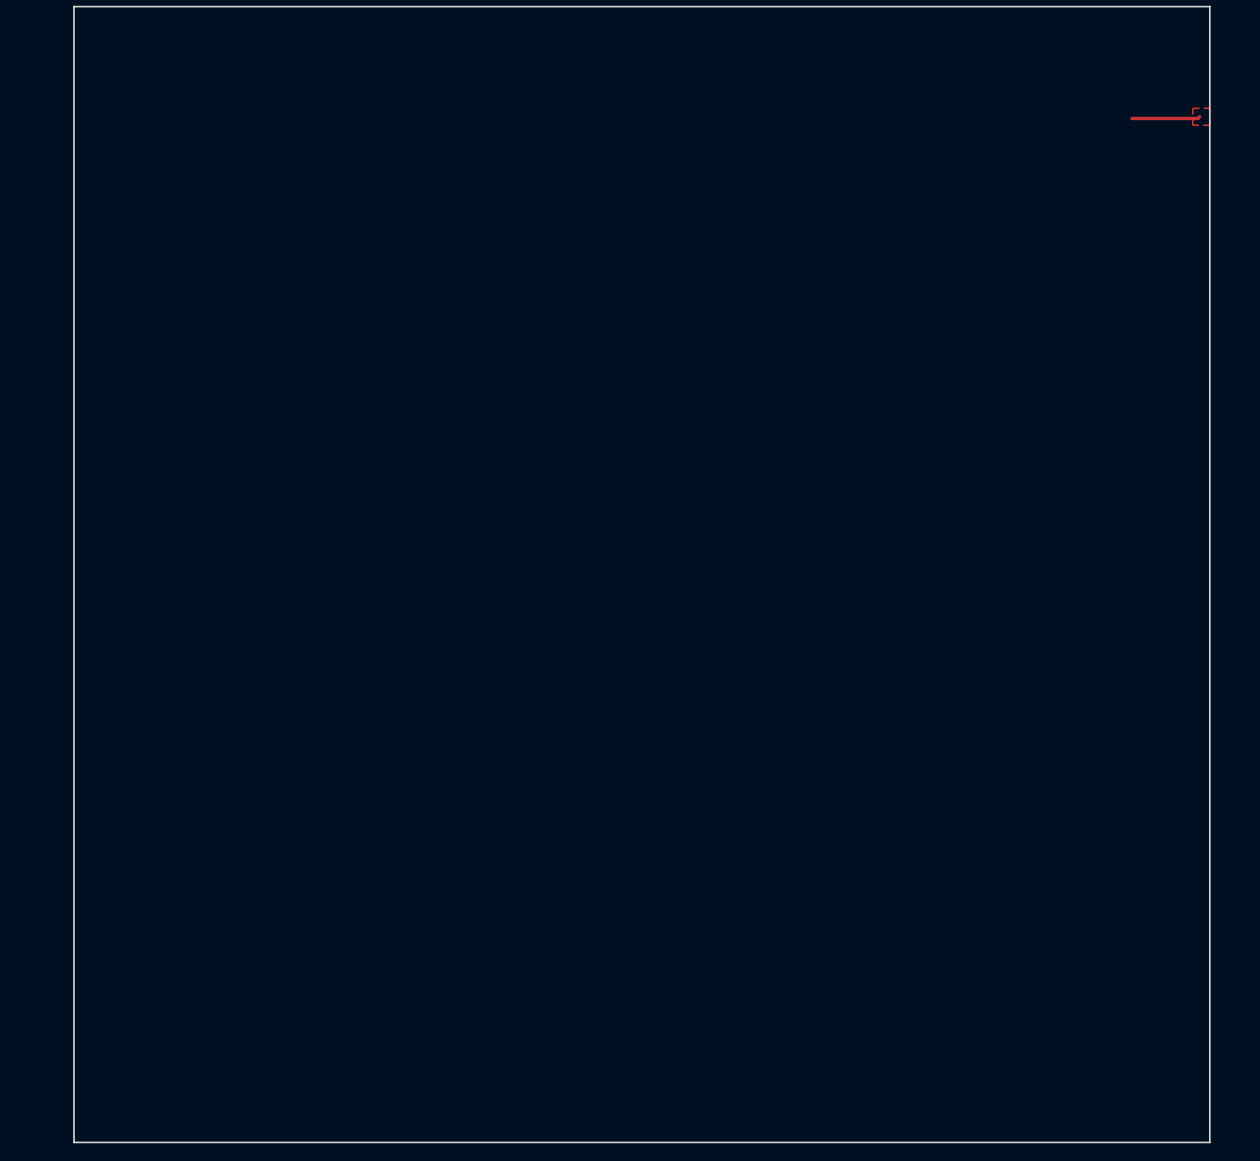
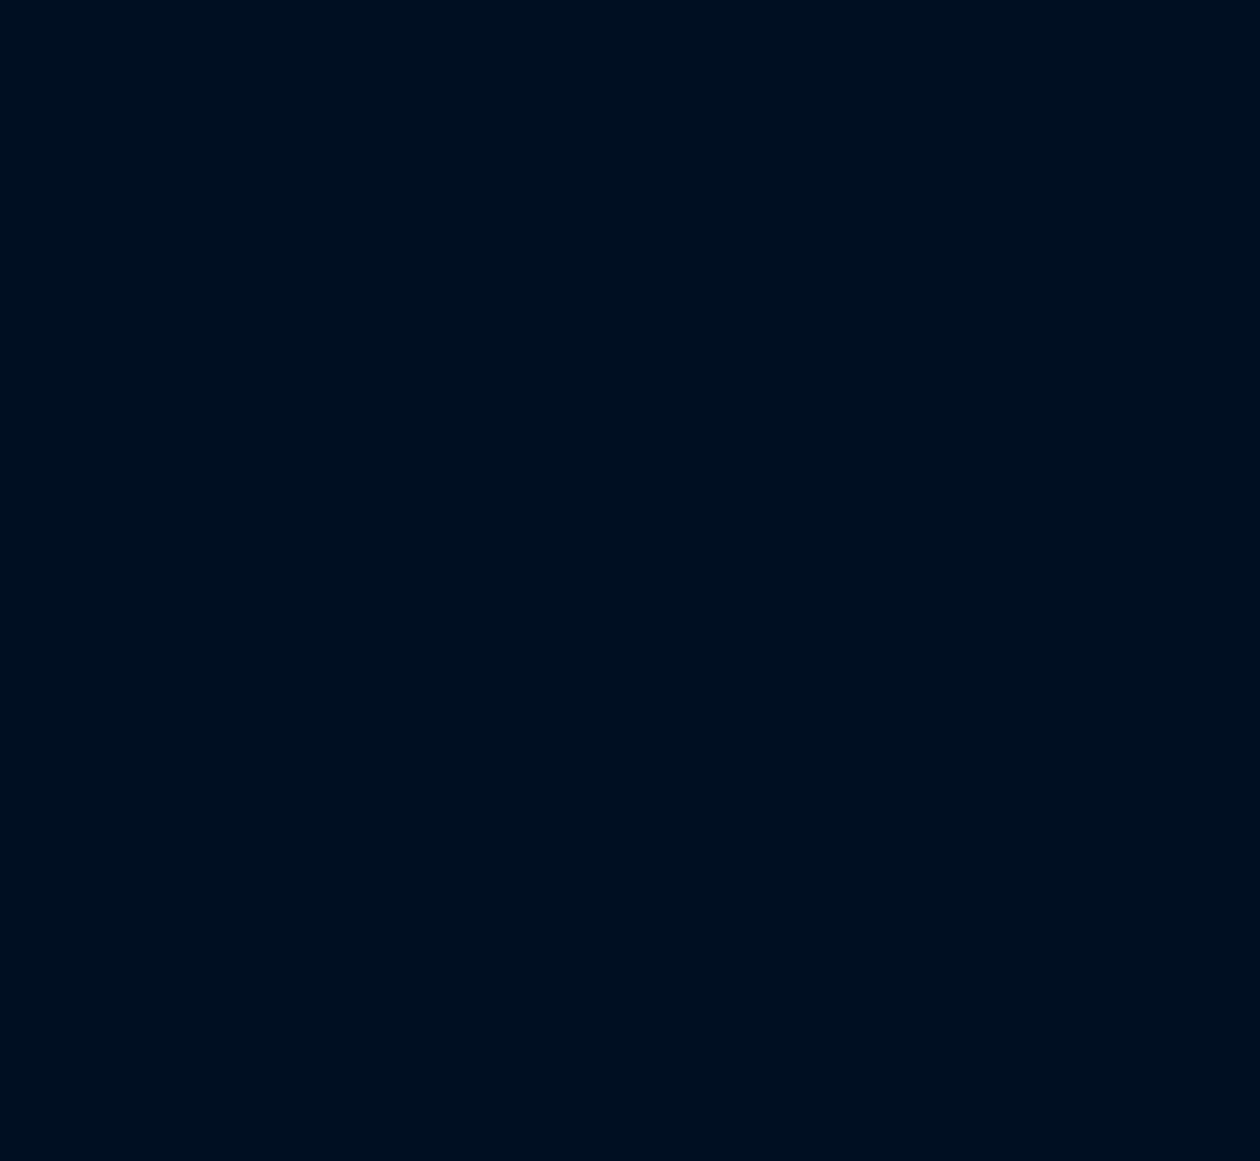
board edge: (1209, 6) (73, 6) (73, 1142) (1209, 1142) (1209, 6) -> none
top zone outline: (1209, 108) (1192, 108) (1192, 125) (1209, 125) (1209, 108) -> none
top track: (1199, 116) (1197, 118) (1131, 118) -> none

